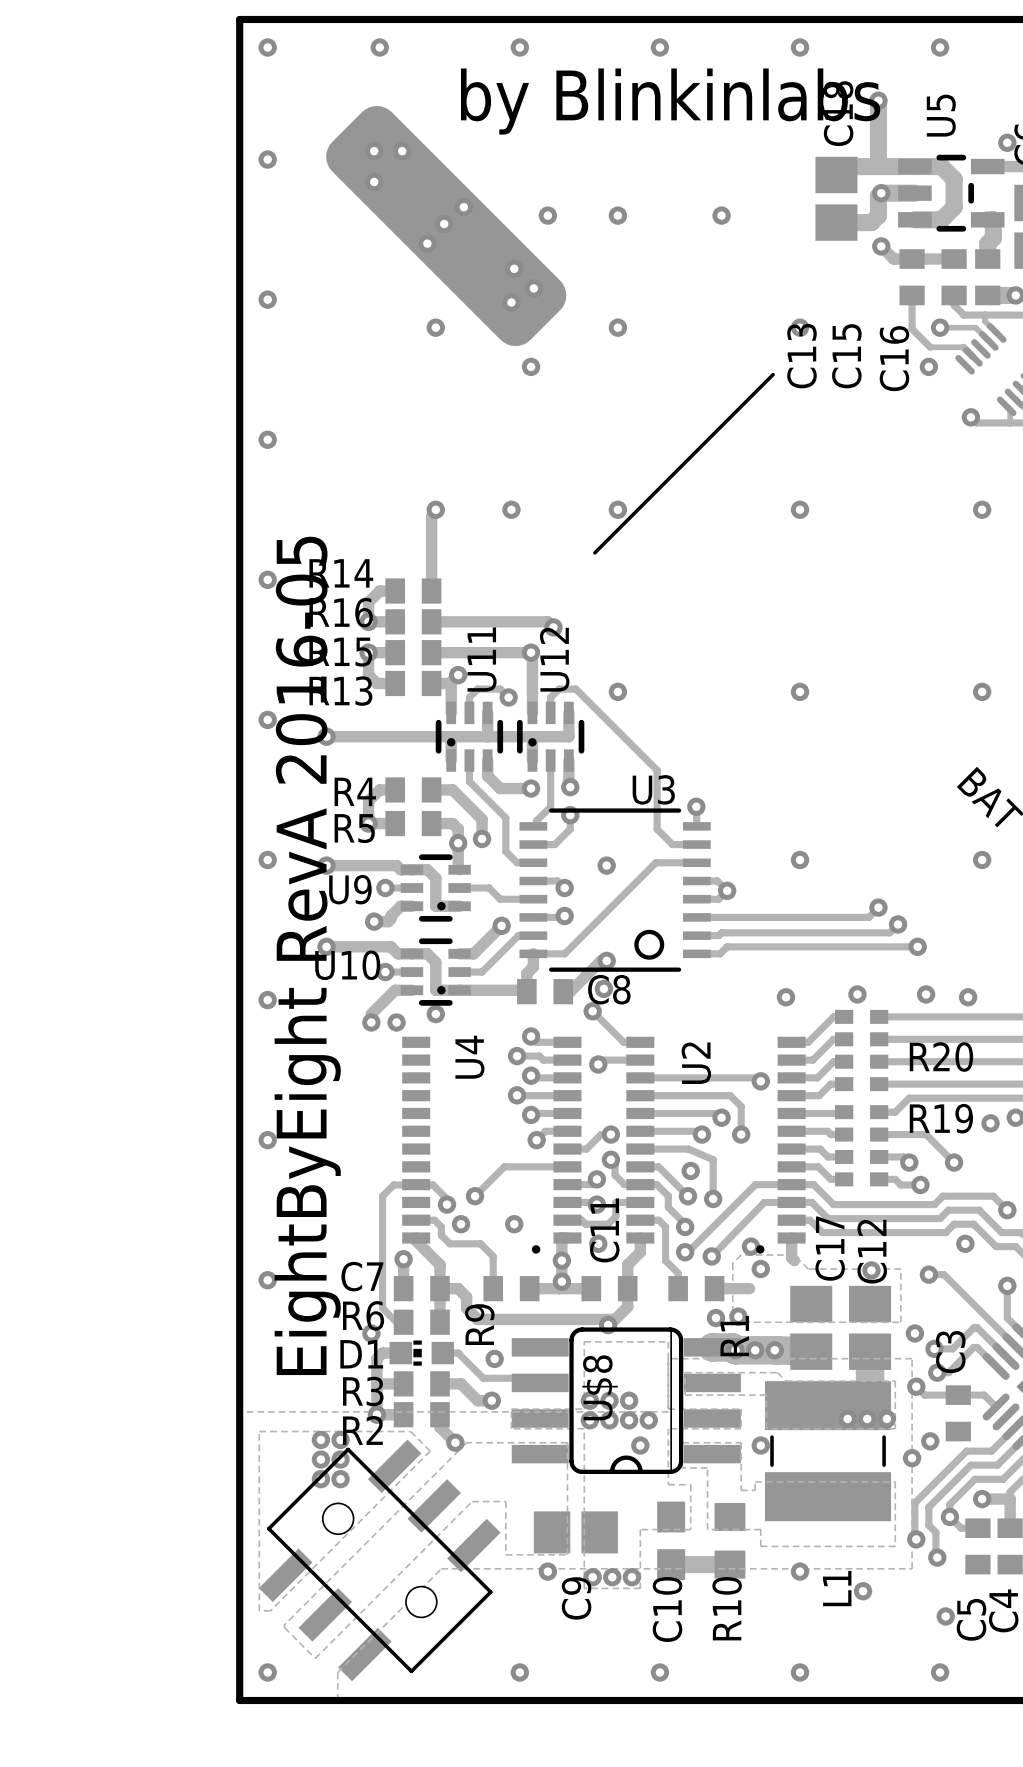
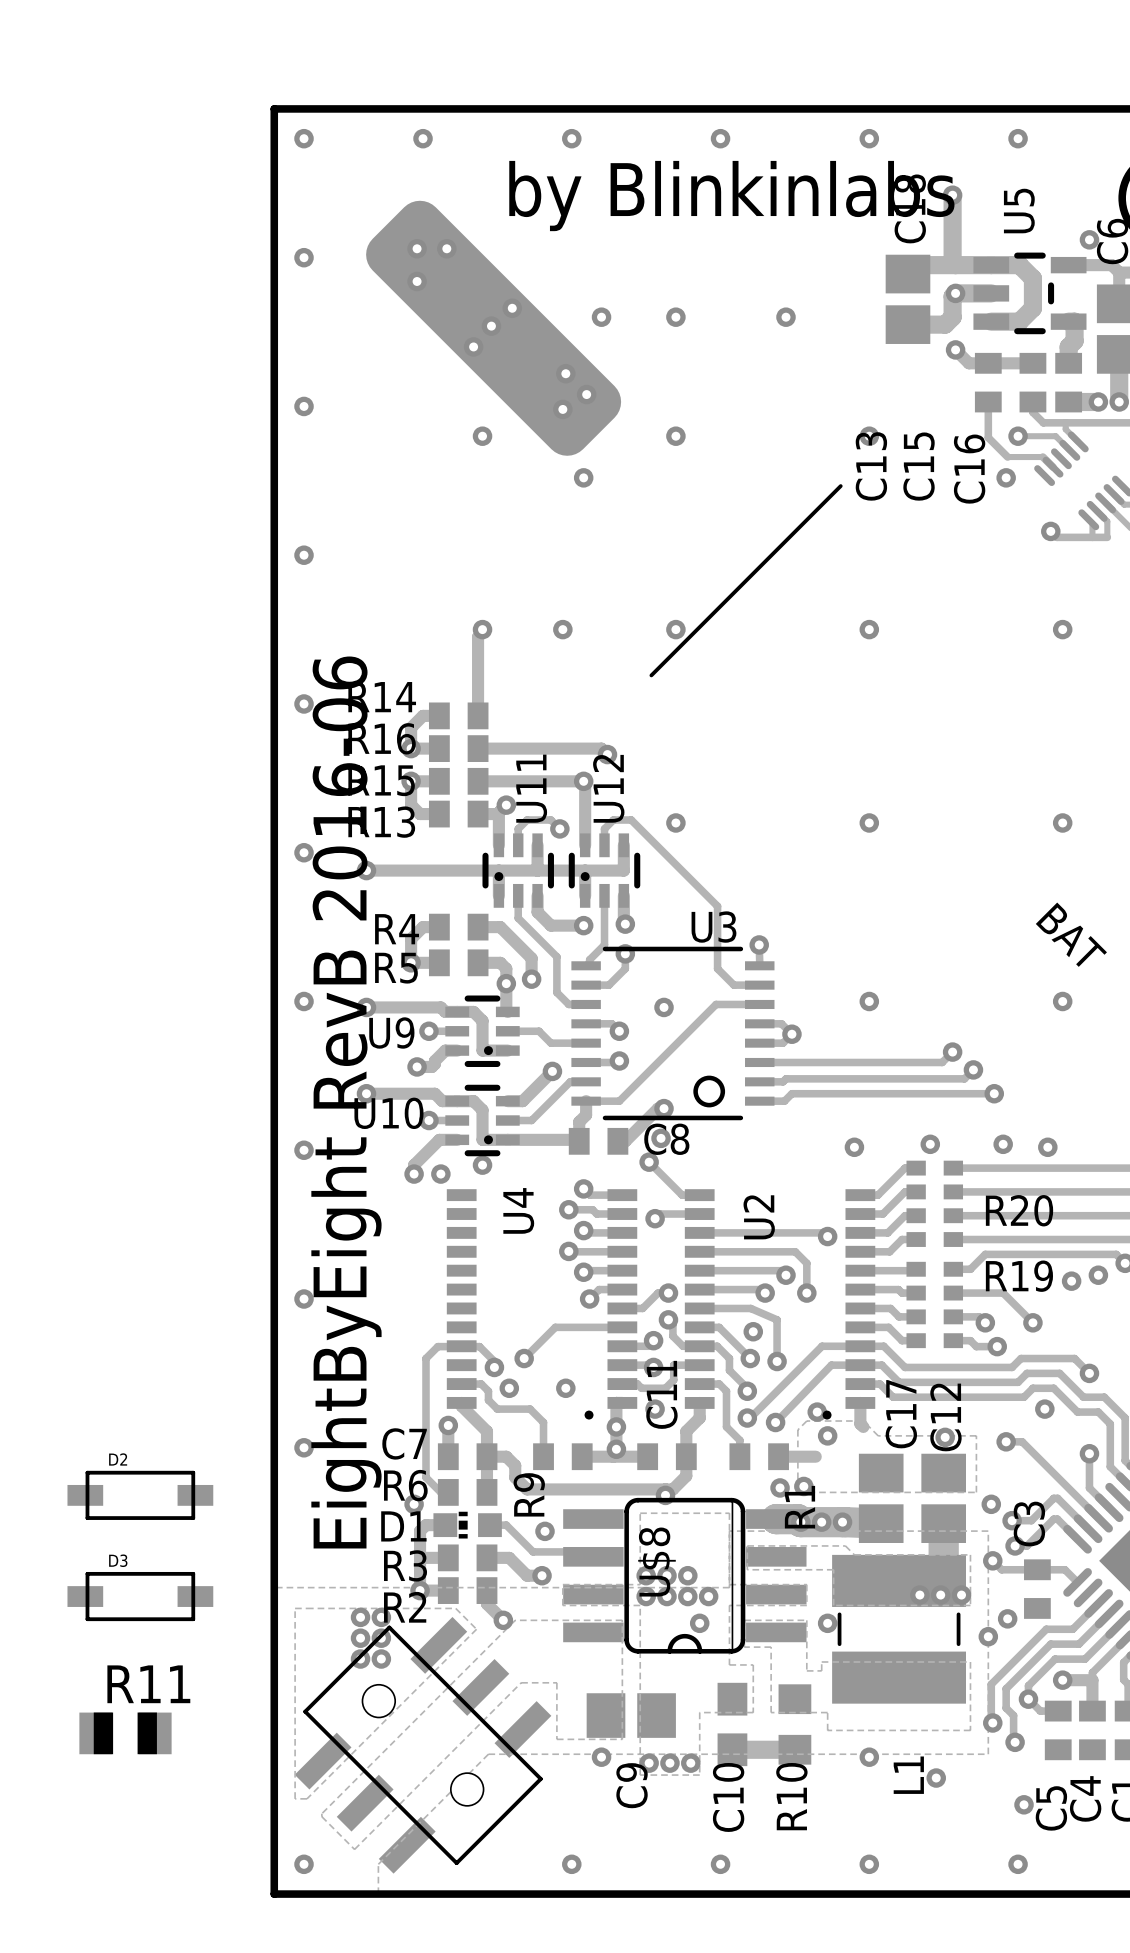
text: EightByEight RevA 2016-05 (307, 955) -> EightByEight RevB 2016-06 (346, 1102)
D2: none -> (140, 1495)
D3: none -> (140, 1596)
R11: none -> (125, 1733)

